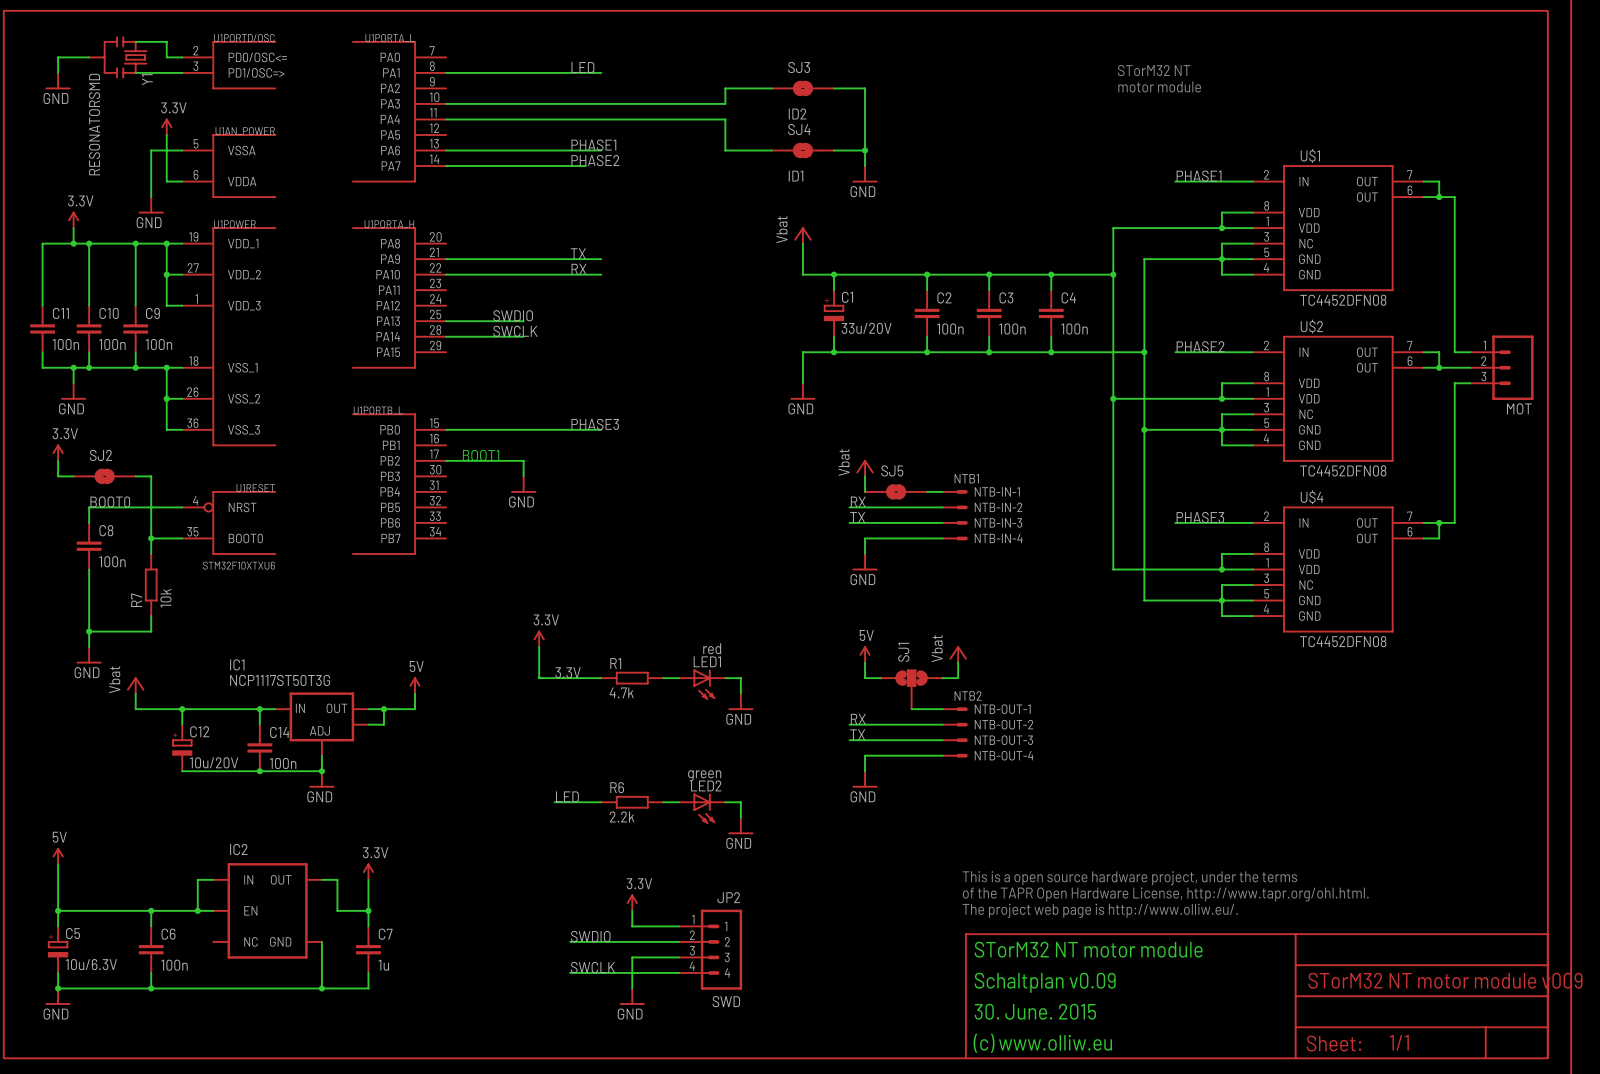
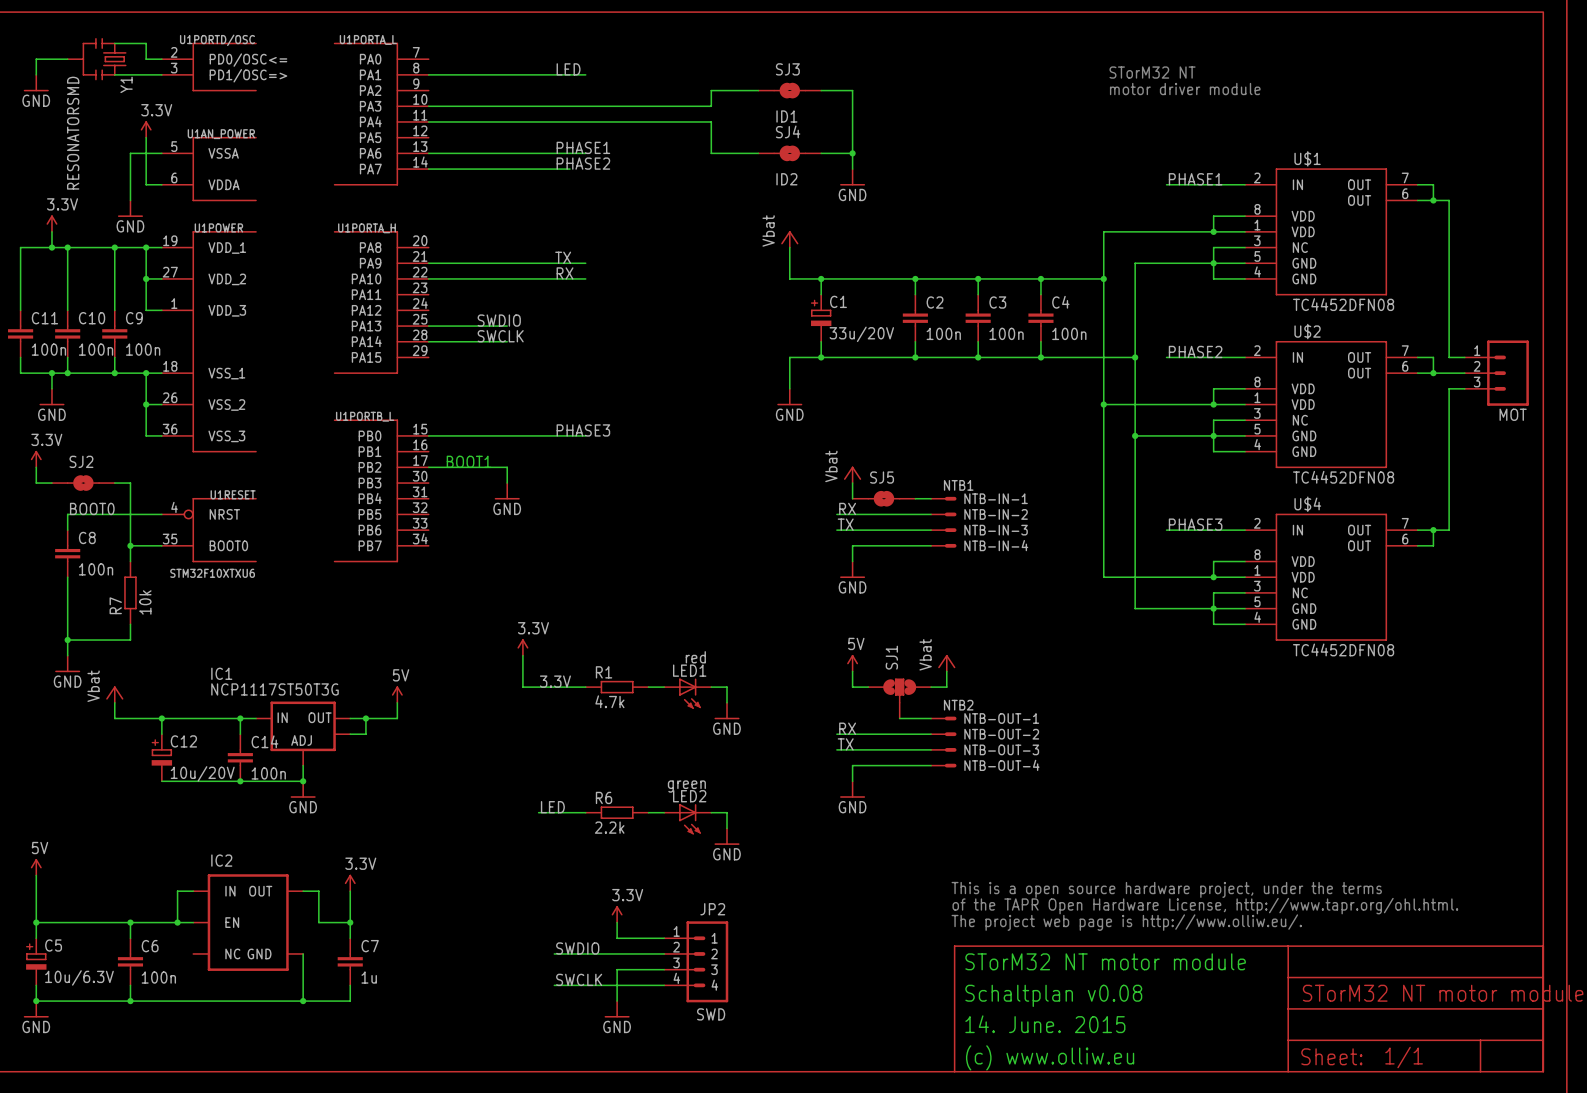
text: motor module (1159, 86) -> motor driver module (1185, 89)
SJ3 value: ID2 (797, 113) -> ID1 (786, 116)
SJ4 value: ID1 (796, 176) -> ID2 (786, 179)
text: Schaltplan v0.09 (1045, 982) -> Schaltplan v0.08 (1053, 995)
text: 30. June. 2015 (1035, 1011) -> 14. June. 2015 (1045, 1024)

